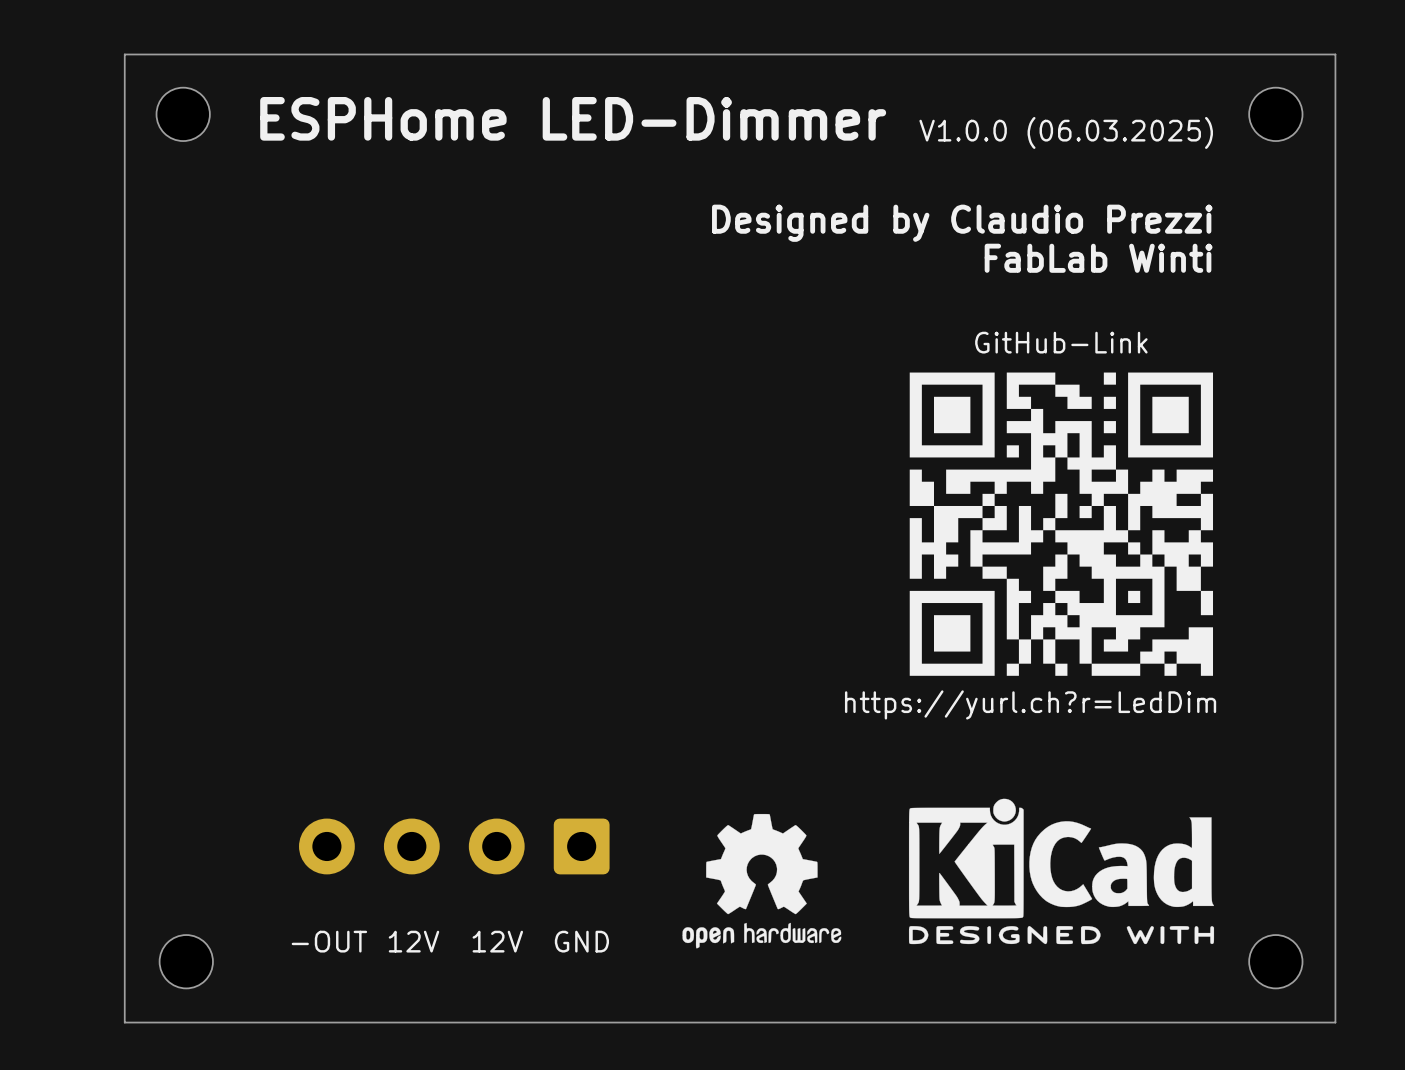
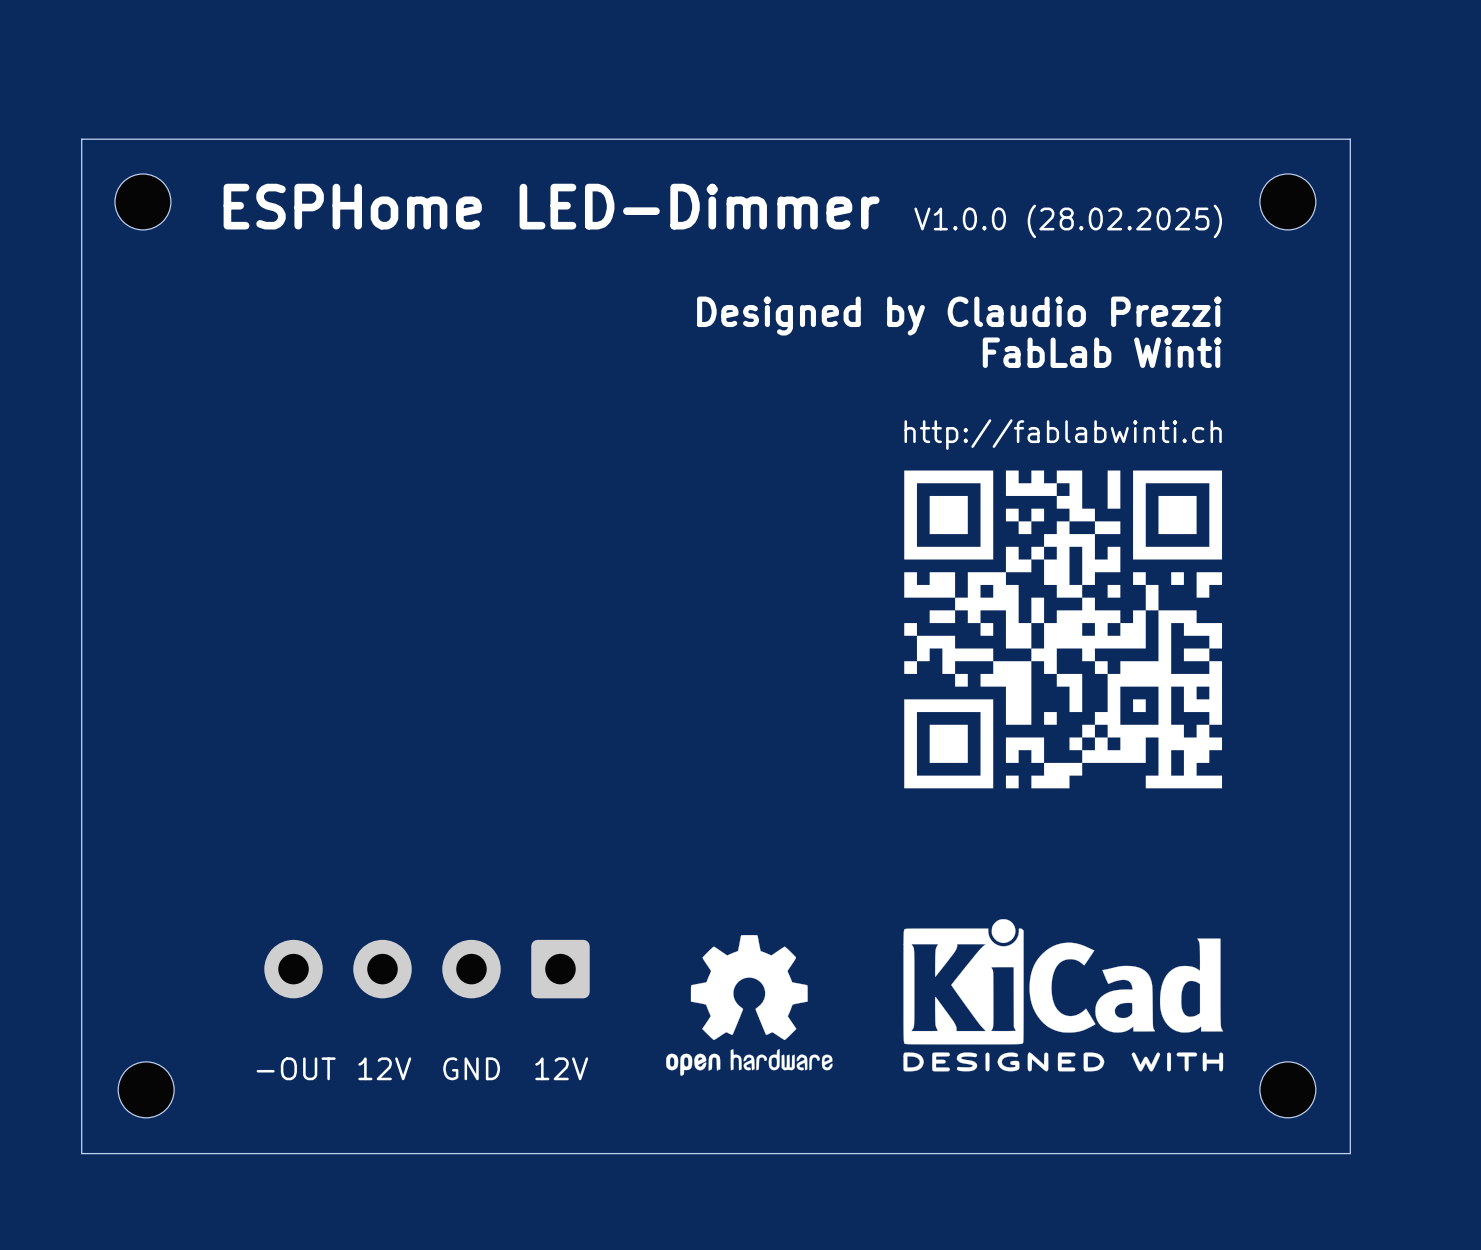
text: V1.0.0 (06.03.2025) (1066, 132) -> V1.0.0 (28.02.2025) (1068, 221)
drawing shape: [844, 331, 1217, 720] -> [904, 419, 1223, 789]
text: 12V (497, 941) -> GND (471, 1068)
text: GND (581, 941) -> 12V (561, 1068)

